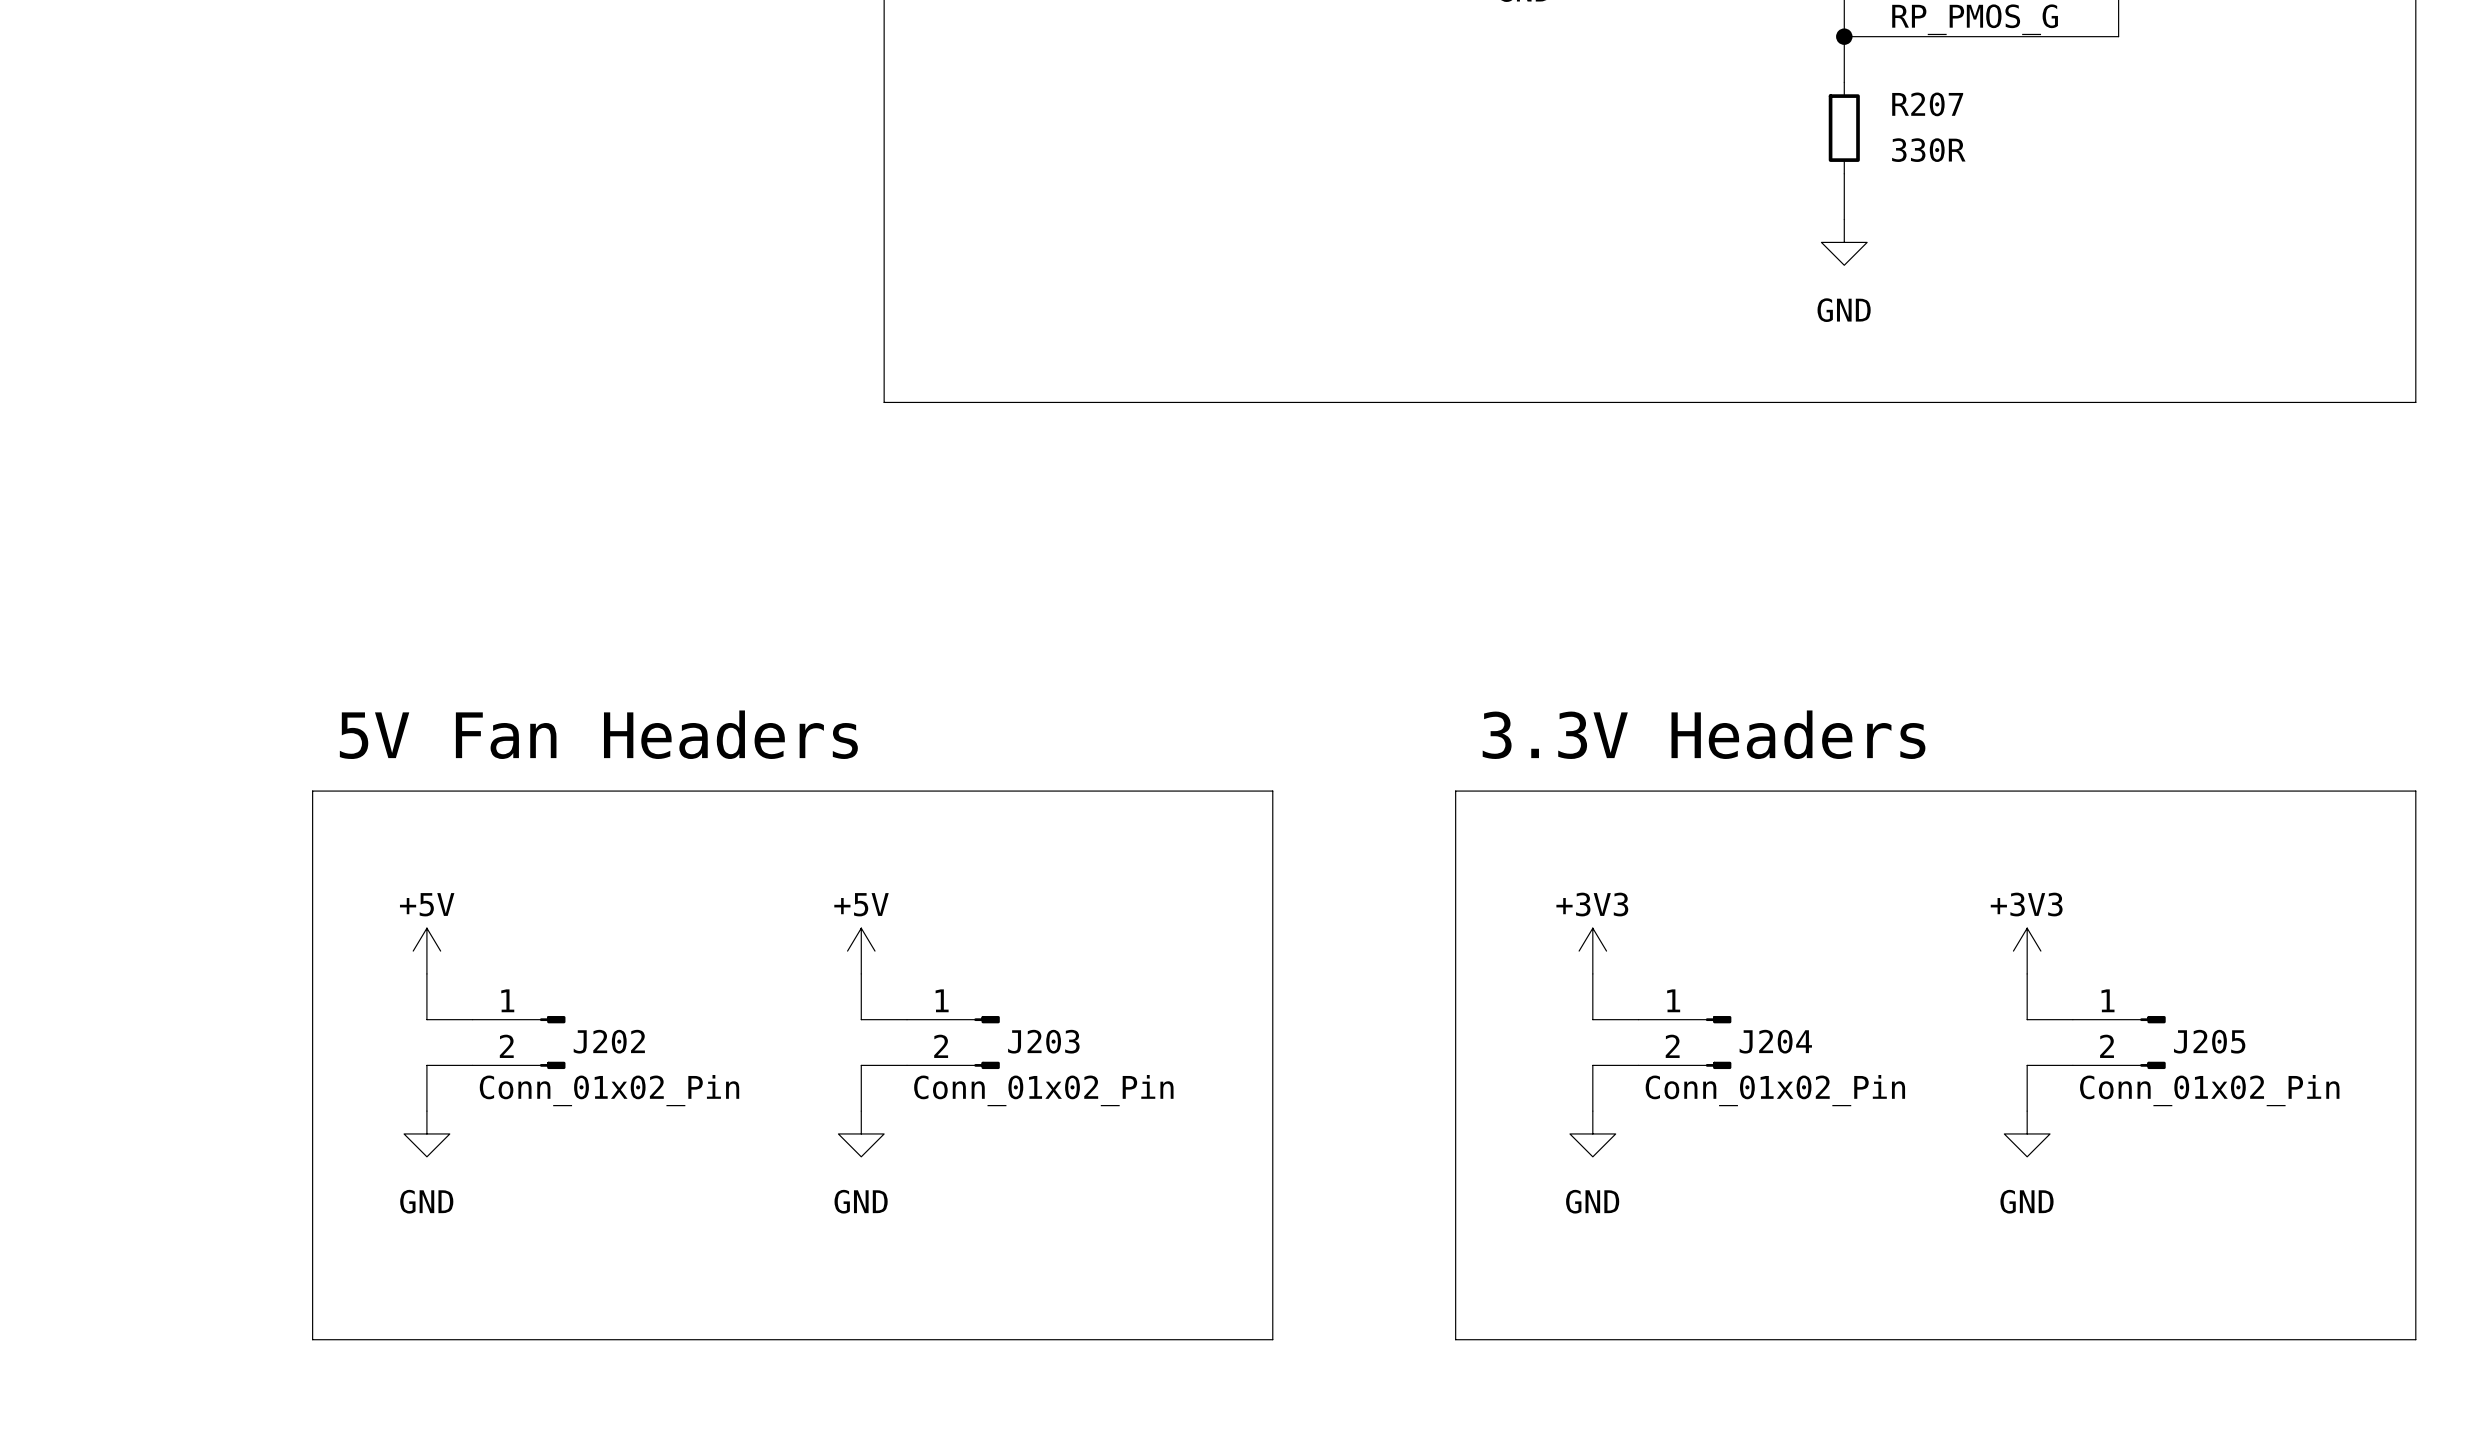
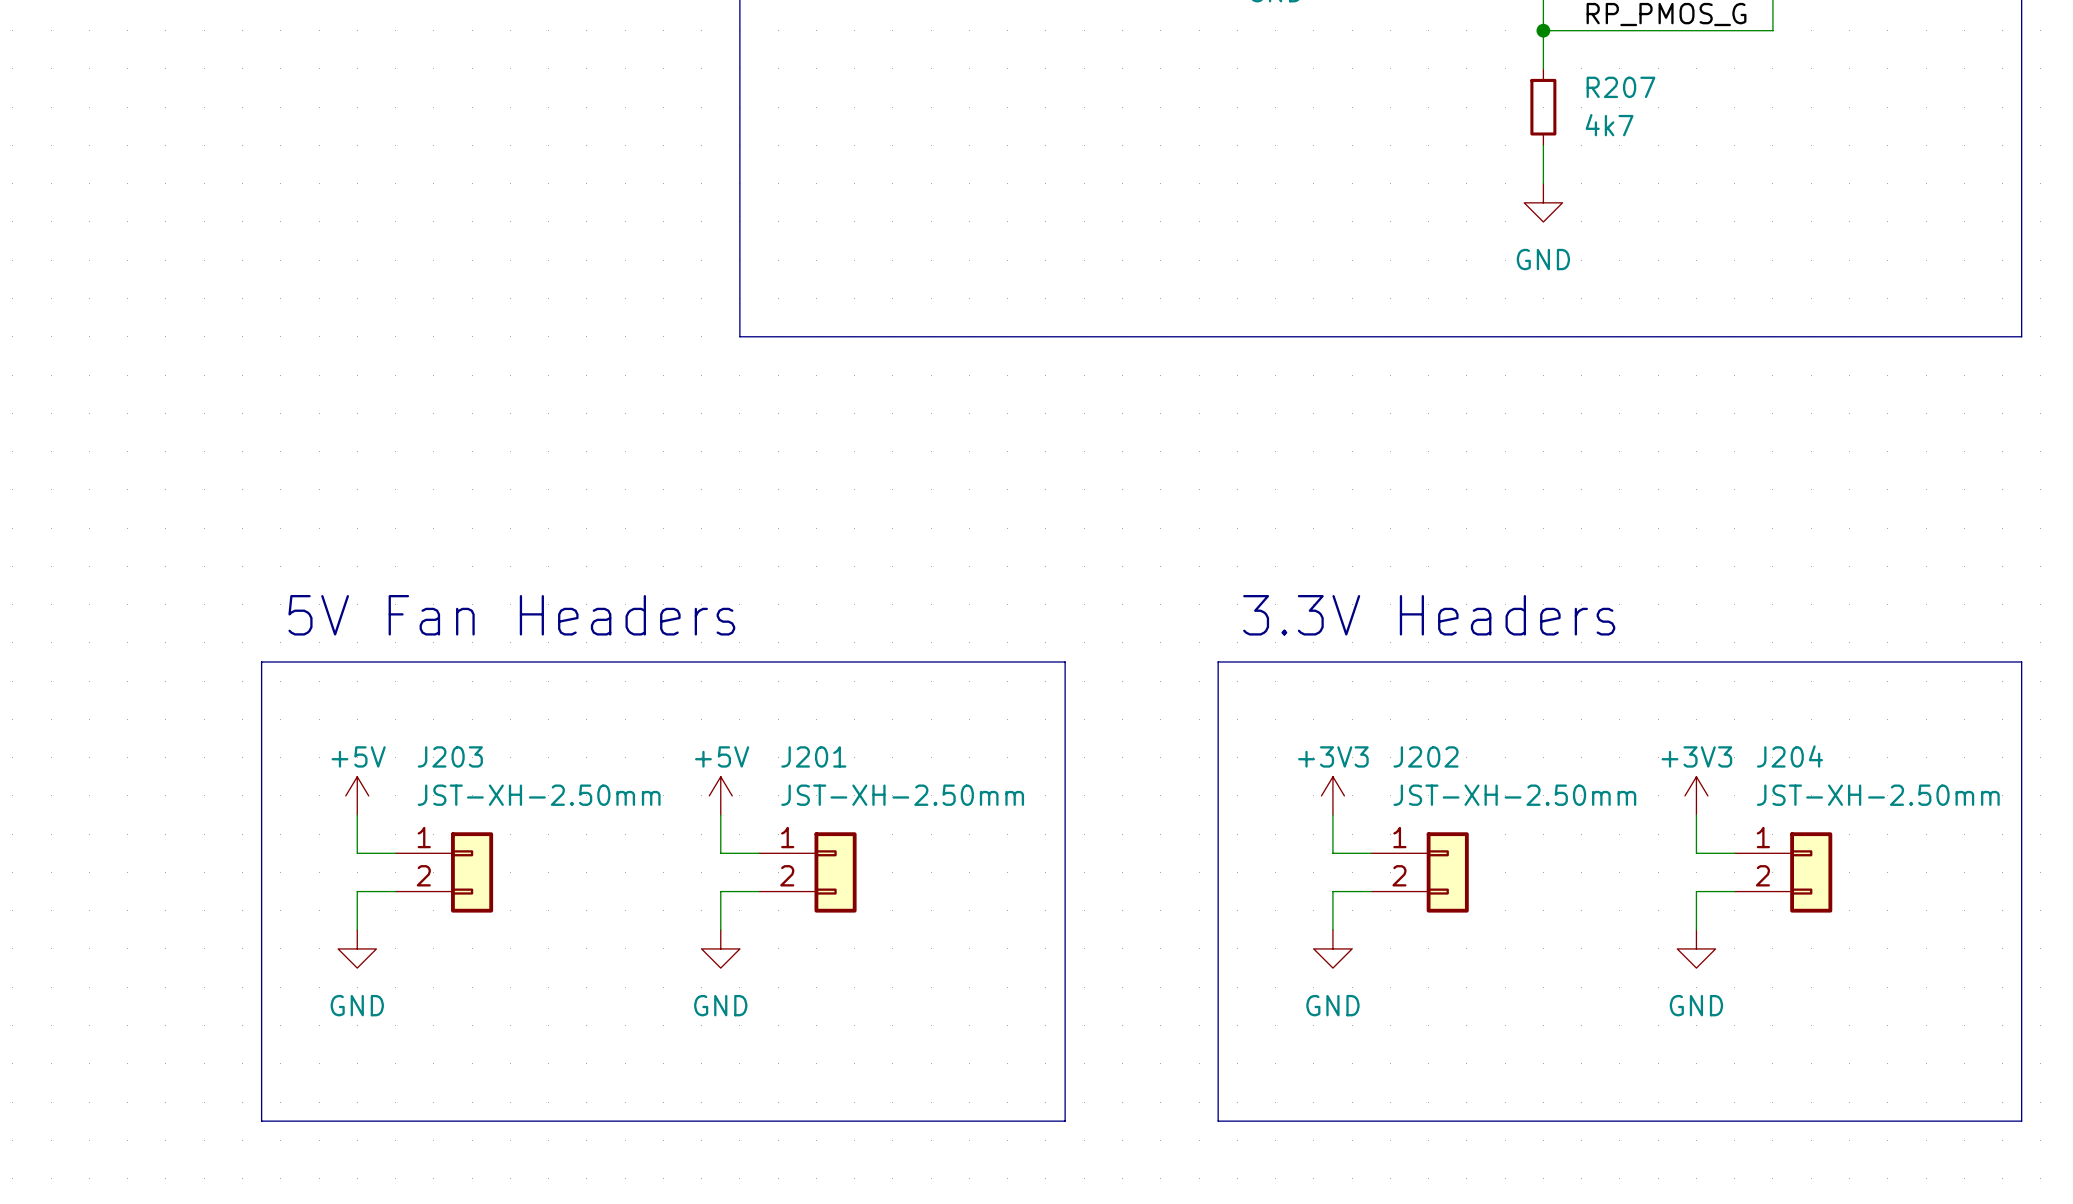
R207 value: 330R (1928, 150) -> 4k7 (1609, 125)
J202 symbol: [472, 1016, 566, 1070] -> [1371, 832, 1469, 913]
J203 symbol: [907, 1016, 1000, 1070] -> [395, 832, 494, 913]
J204 symbol: [1638, 1016, 1732, 1070] -> [1734, 832, 1833, 913]
J202 name position: J202 (609, 1041) -> J202 (1426, 756)
J203 name position: J203 (1043, 1041) -> J203 (450, 756)
J204 name position: J204 (1775, 1041) -> J204 (1789, 756)
J201: none -> JST-XH-2.50mm (807, 872)
J205: Conn_01x02_Pin (2119, 1042) -> none
J202 value: Conn_01x02_Pin (609, 1090) -> JST-XH-2.50mm (1514, 795)
J203 value: Conn_01x02_Pin (1043, 1090) -> JST-XH-2.50mm (539, 795)
J204 value: Conn_01x02_Pin (1775, 1090) -> JST-XH-2.50mm (1878, 795)

